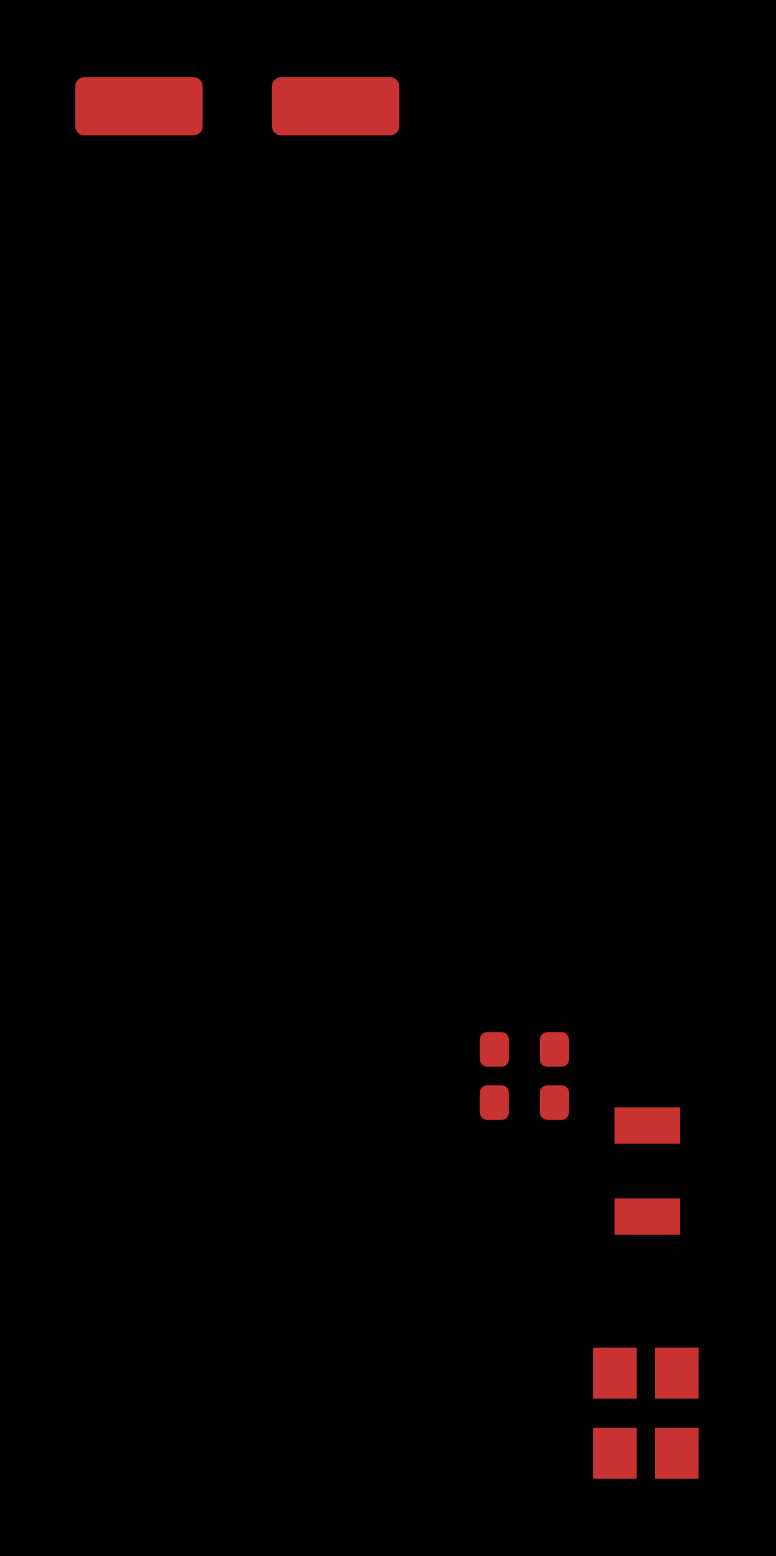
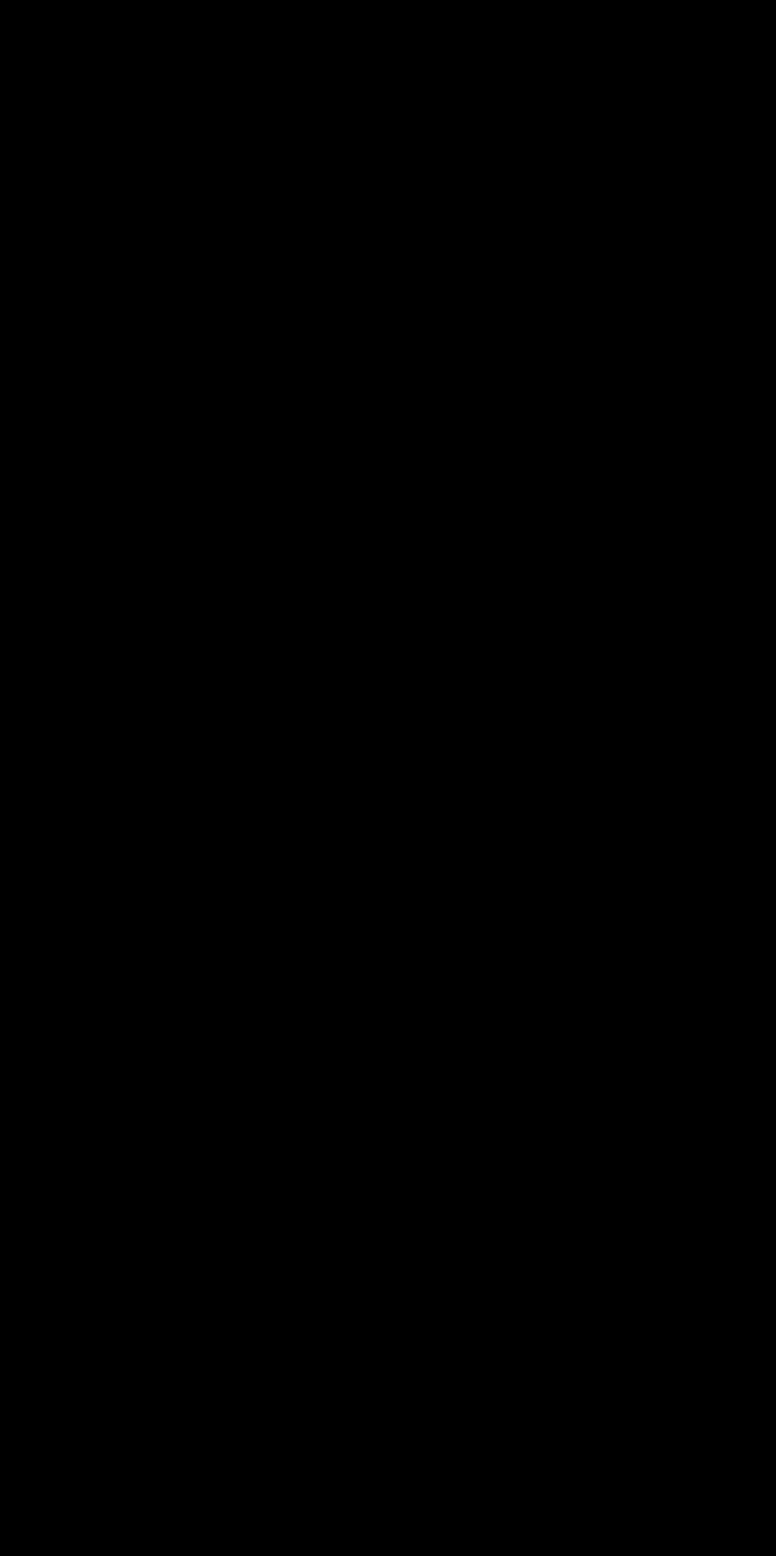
part: (237, 106) -> none
part: (524, 1049) -> none
part: (524, 1102) -> none
part: (647, 1171) -> none
part: (645, 1413) -> none

